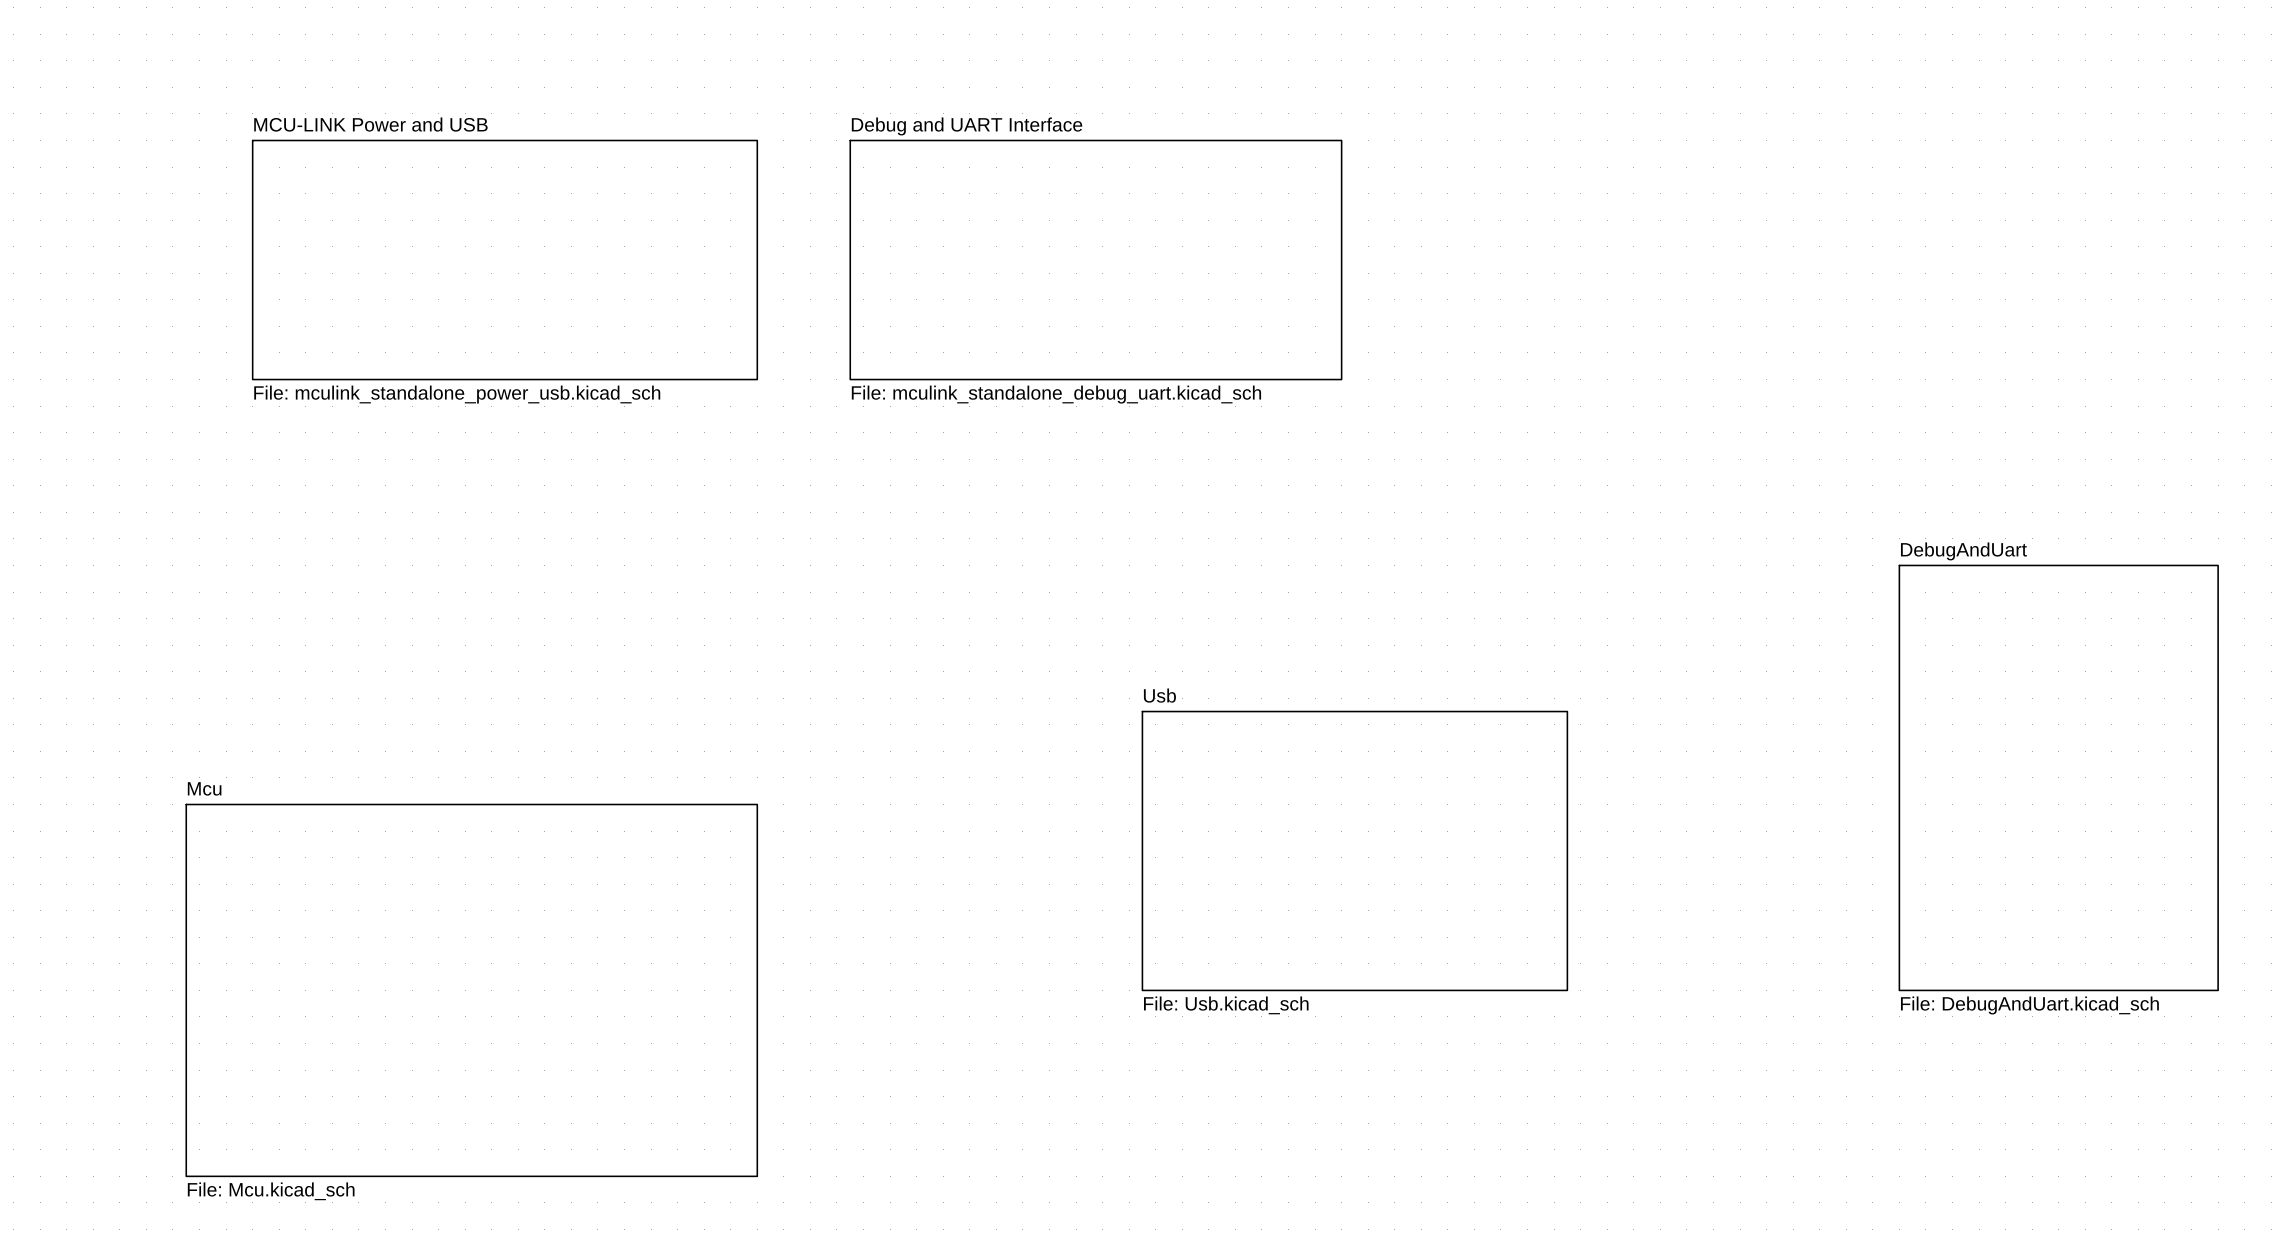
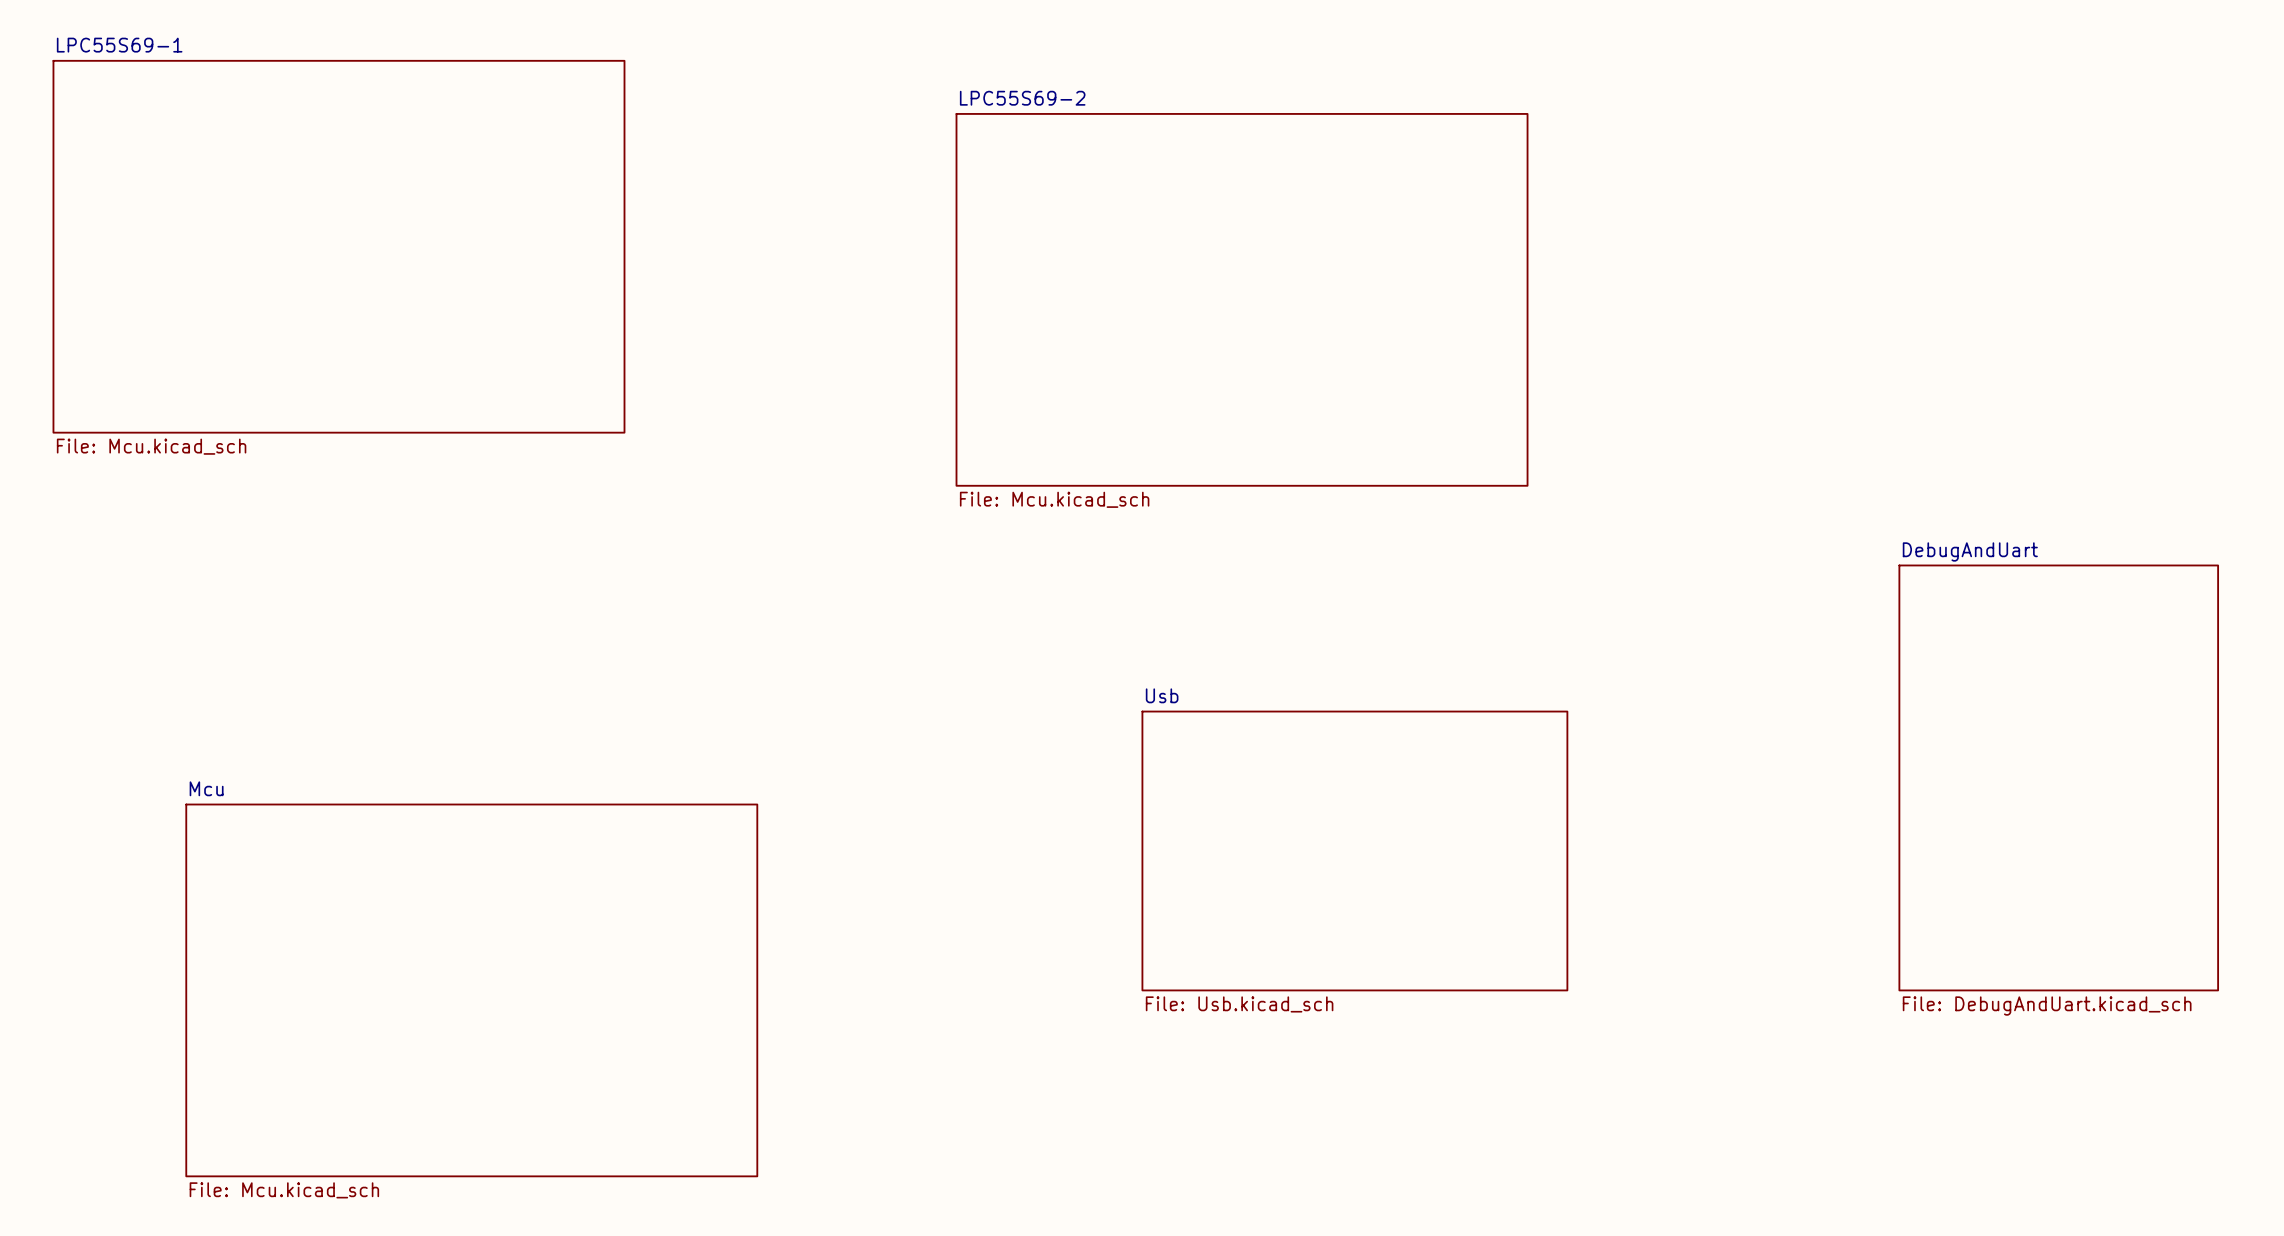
sheet LPC55S69-1: none -> File: Mcu.kicad_sch (338, 246)
sheet MCU-LINK Power and USB: File: mculink_standalone_power_usb.kicad_sch (504, 260) -> none
sheet Debug and UART Interface: File: mculink_standalone_debug_uart.kicad_sch (1095, 260) -> none
sheet LPC55S69-2: none -> File: Mcu.kicad_sch (1242, 299)

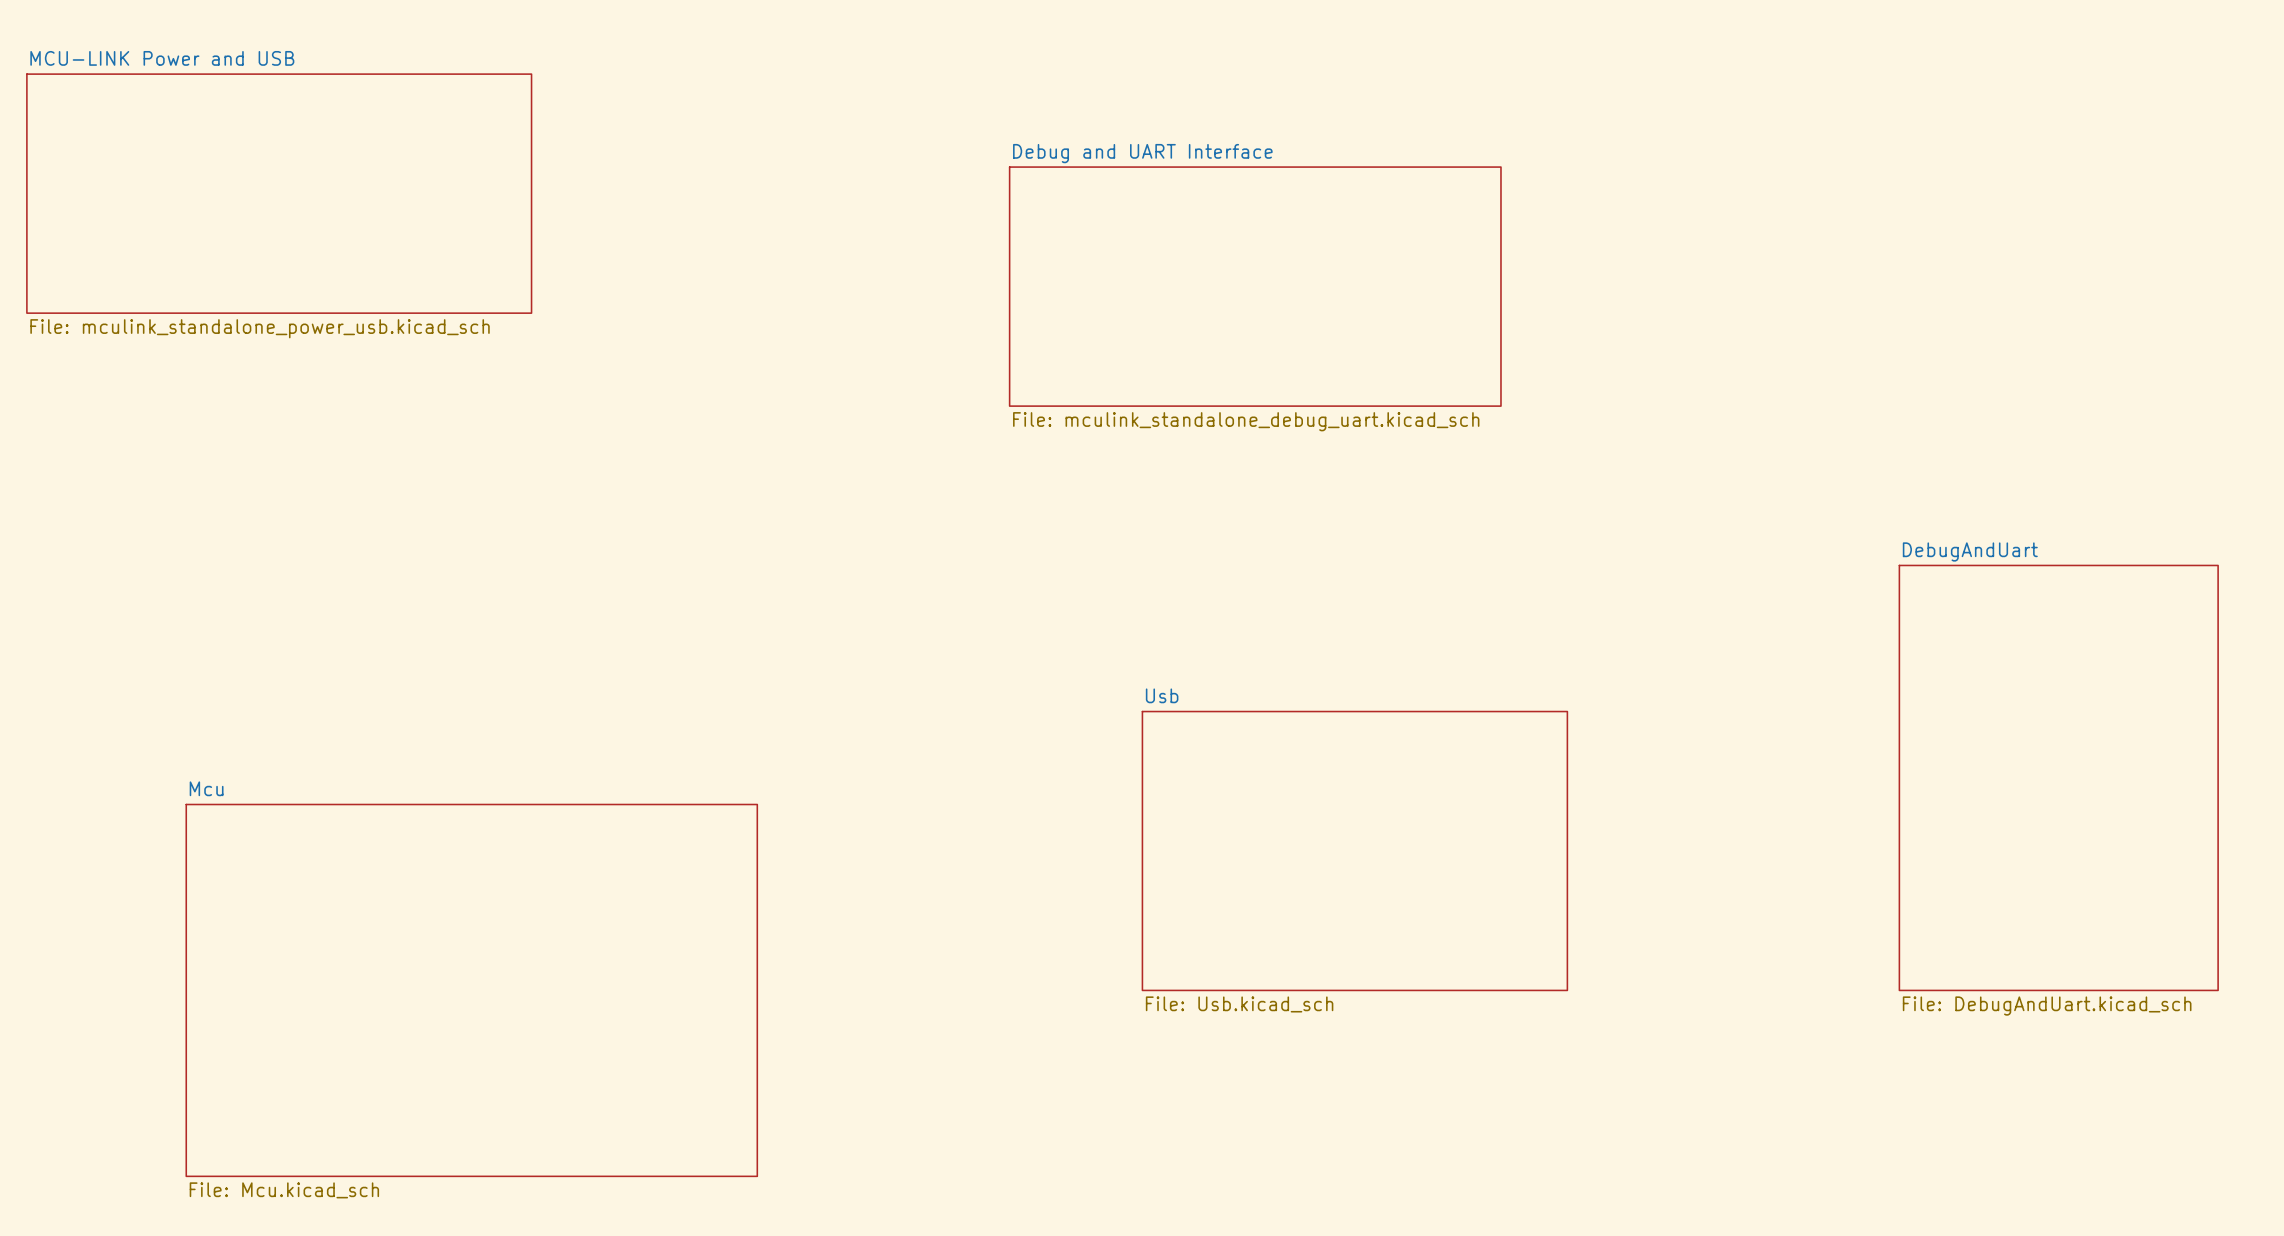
sheet MCU-LINK Power and USB: none -> File: mculink_standalone_power_usb.kicad_sch (279, 193)
sheet LPC55S69-1: File: Mcu.kicad_sch (338, 246) -> none
sheet Debug and UART Interface: none -> File: mculink_standalone_debug_uart.kicad_sch (1255, 286)
sheet LPC55S69-2: File: Mcu.kicad_sch (1242, 299) -> none

